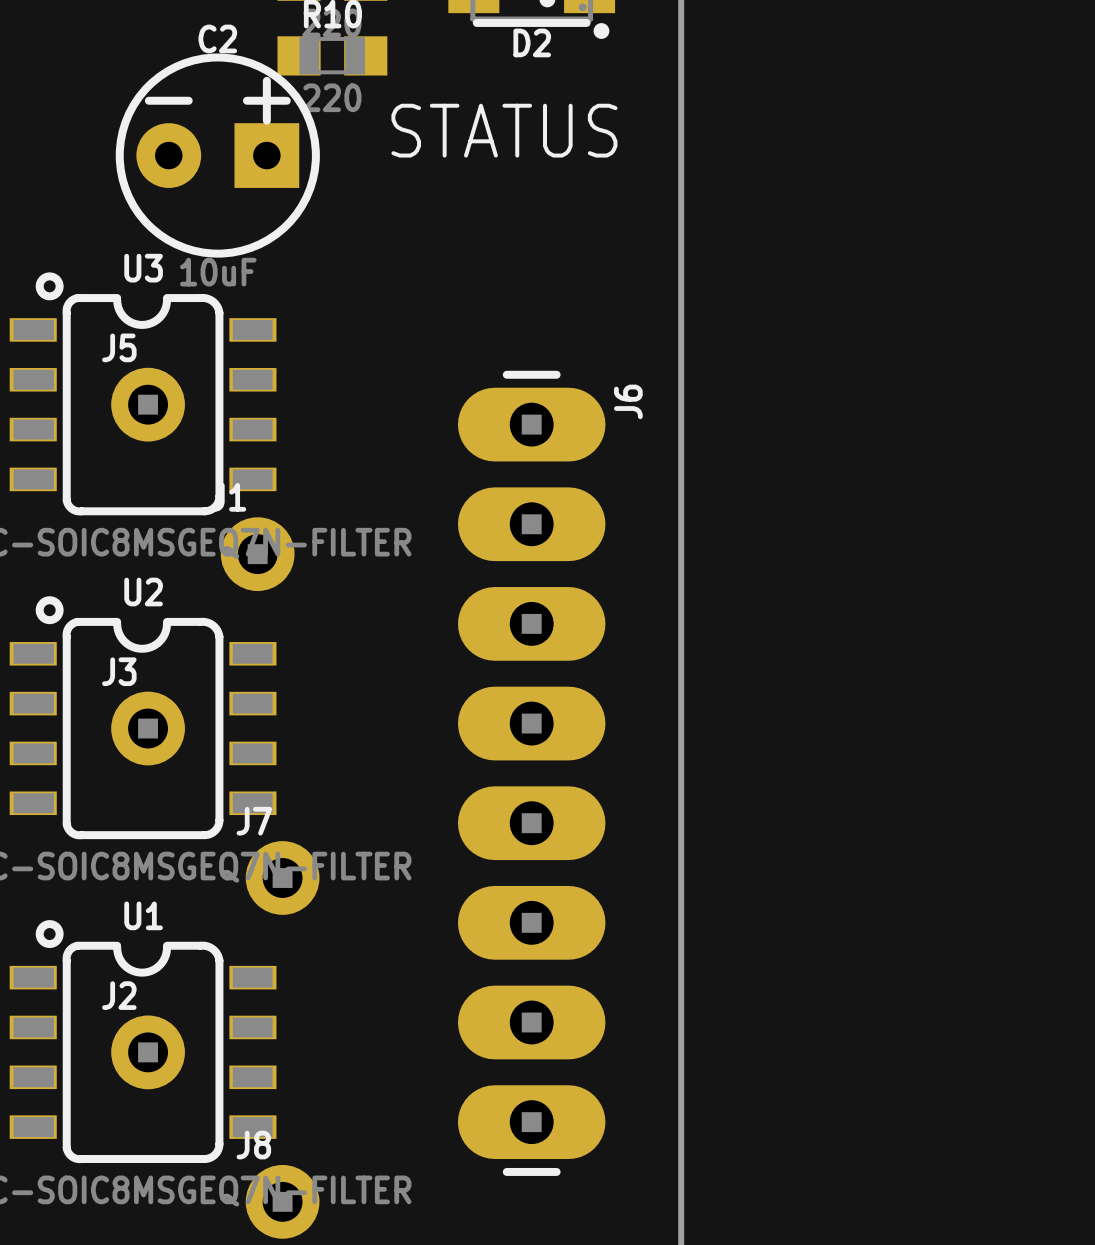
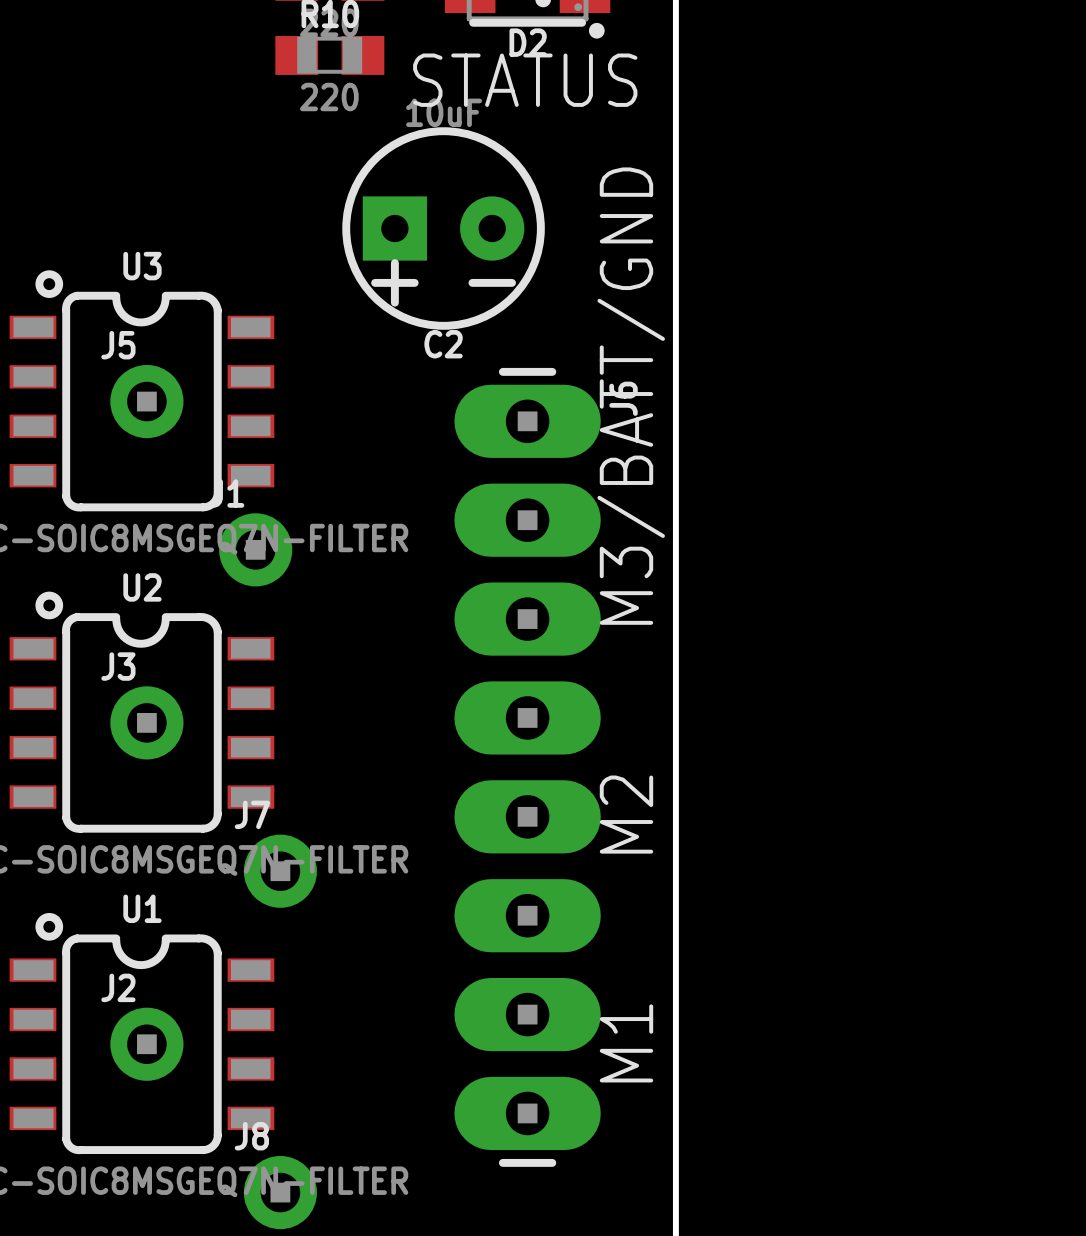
text position: STATUS (504, 130) -> STATUS (525, 80)
C2 rotation: 0° (217, 155) -> 180° (443, 228)
C2 position: (217, 155) -> (443, 228)
text: none -> M1 M2 M3/BATT/GND (631, 624)

